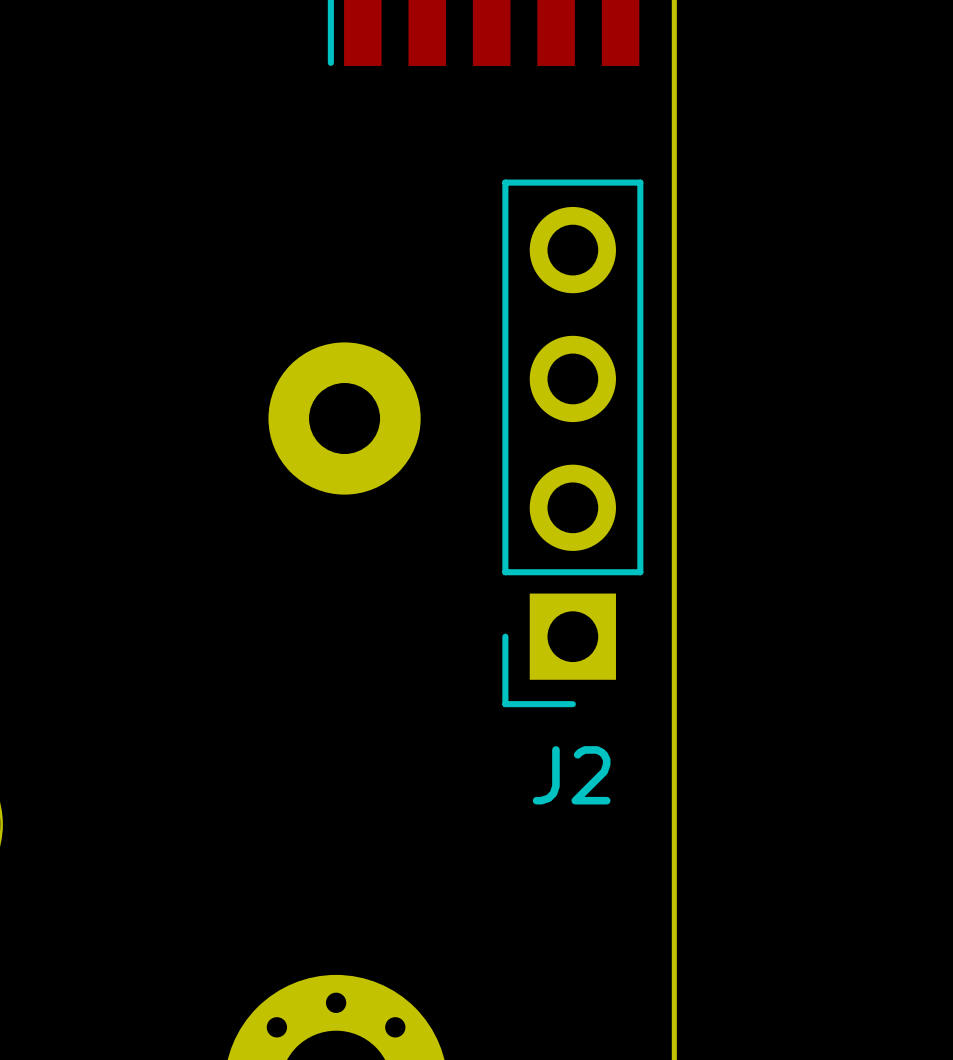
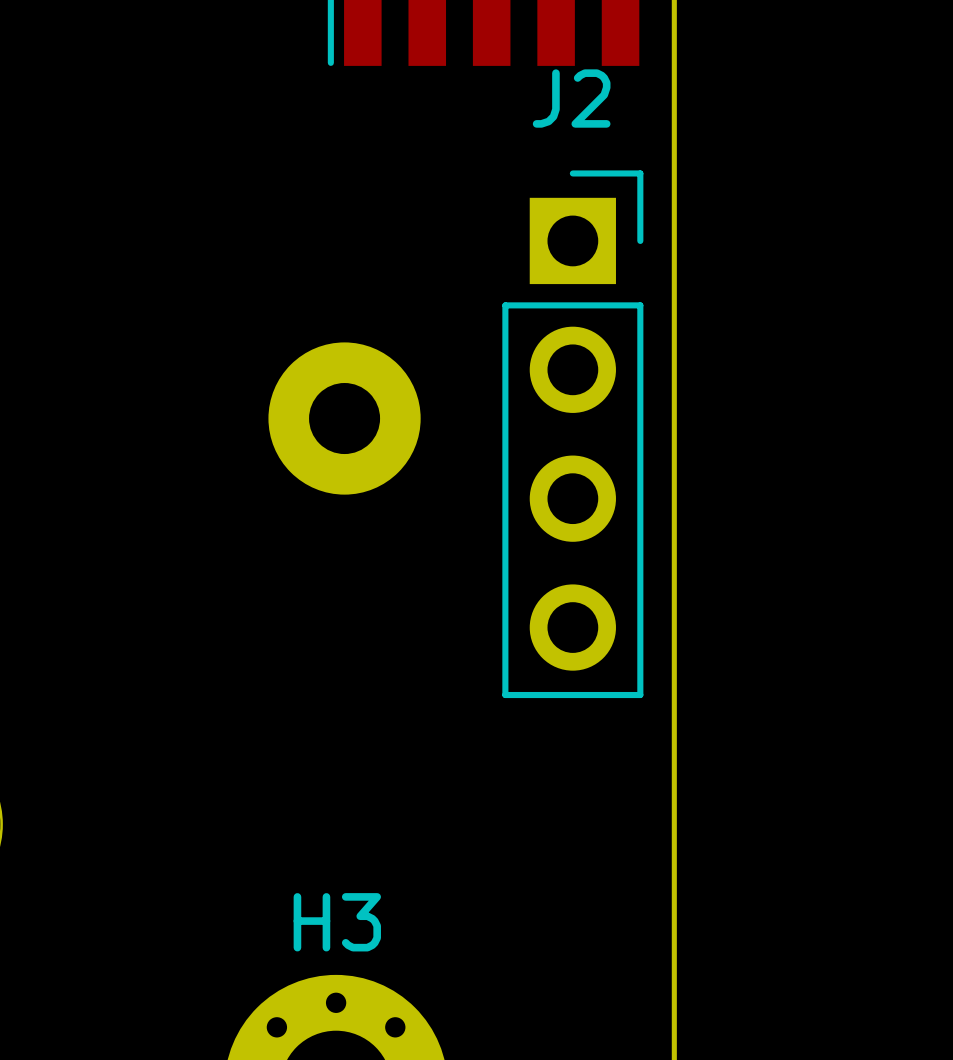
J2 rotation: 0° (572, 443) -> 180° (572, 434)
H3 name: none -> H3 (337, 922)

